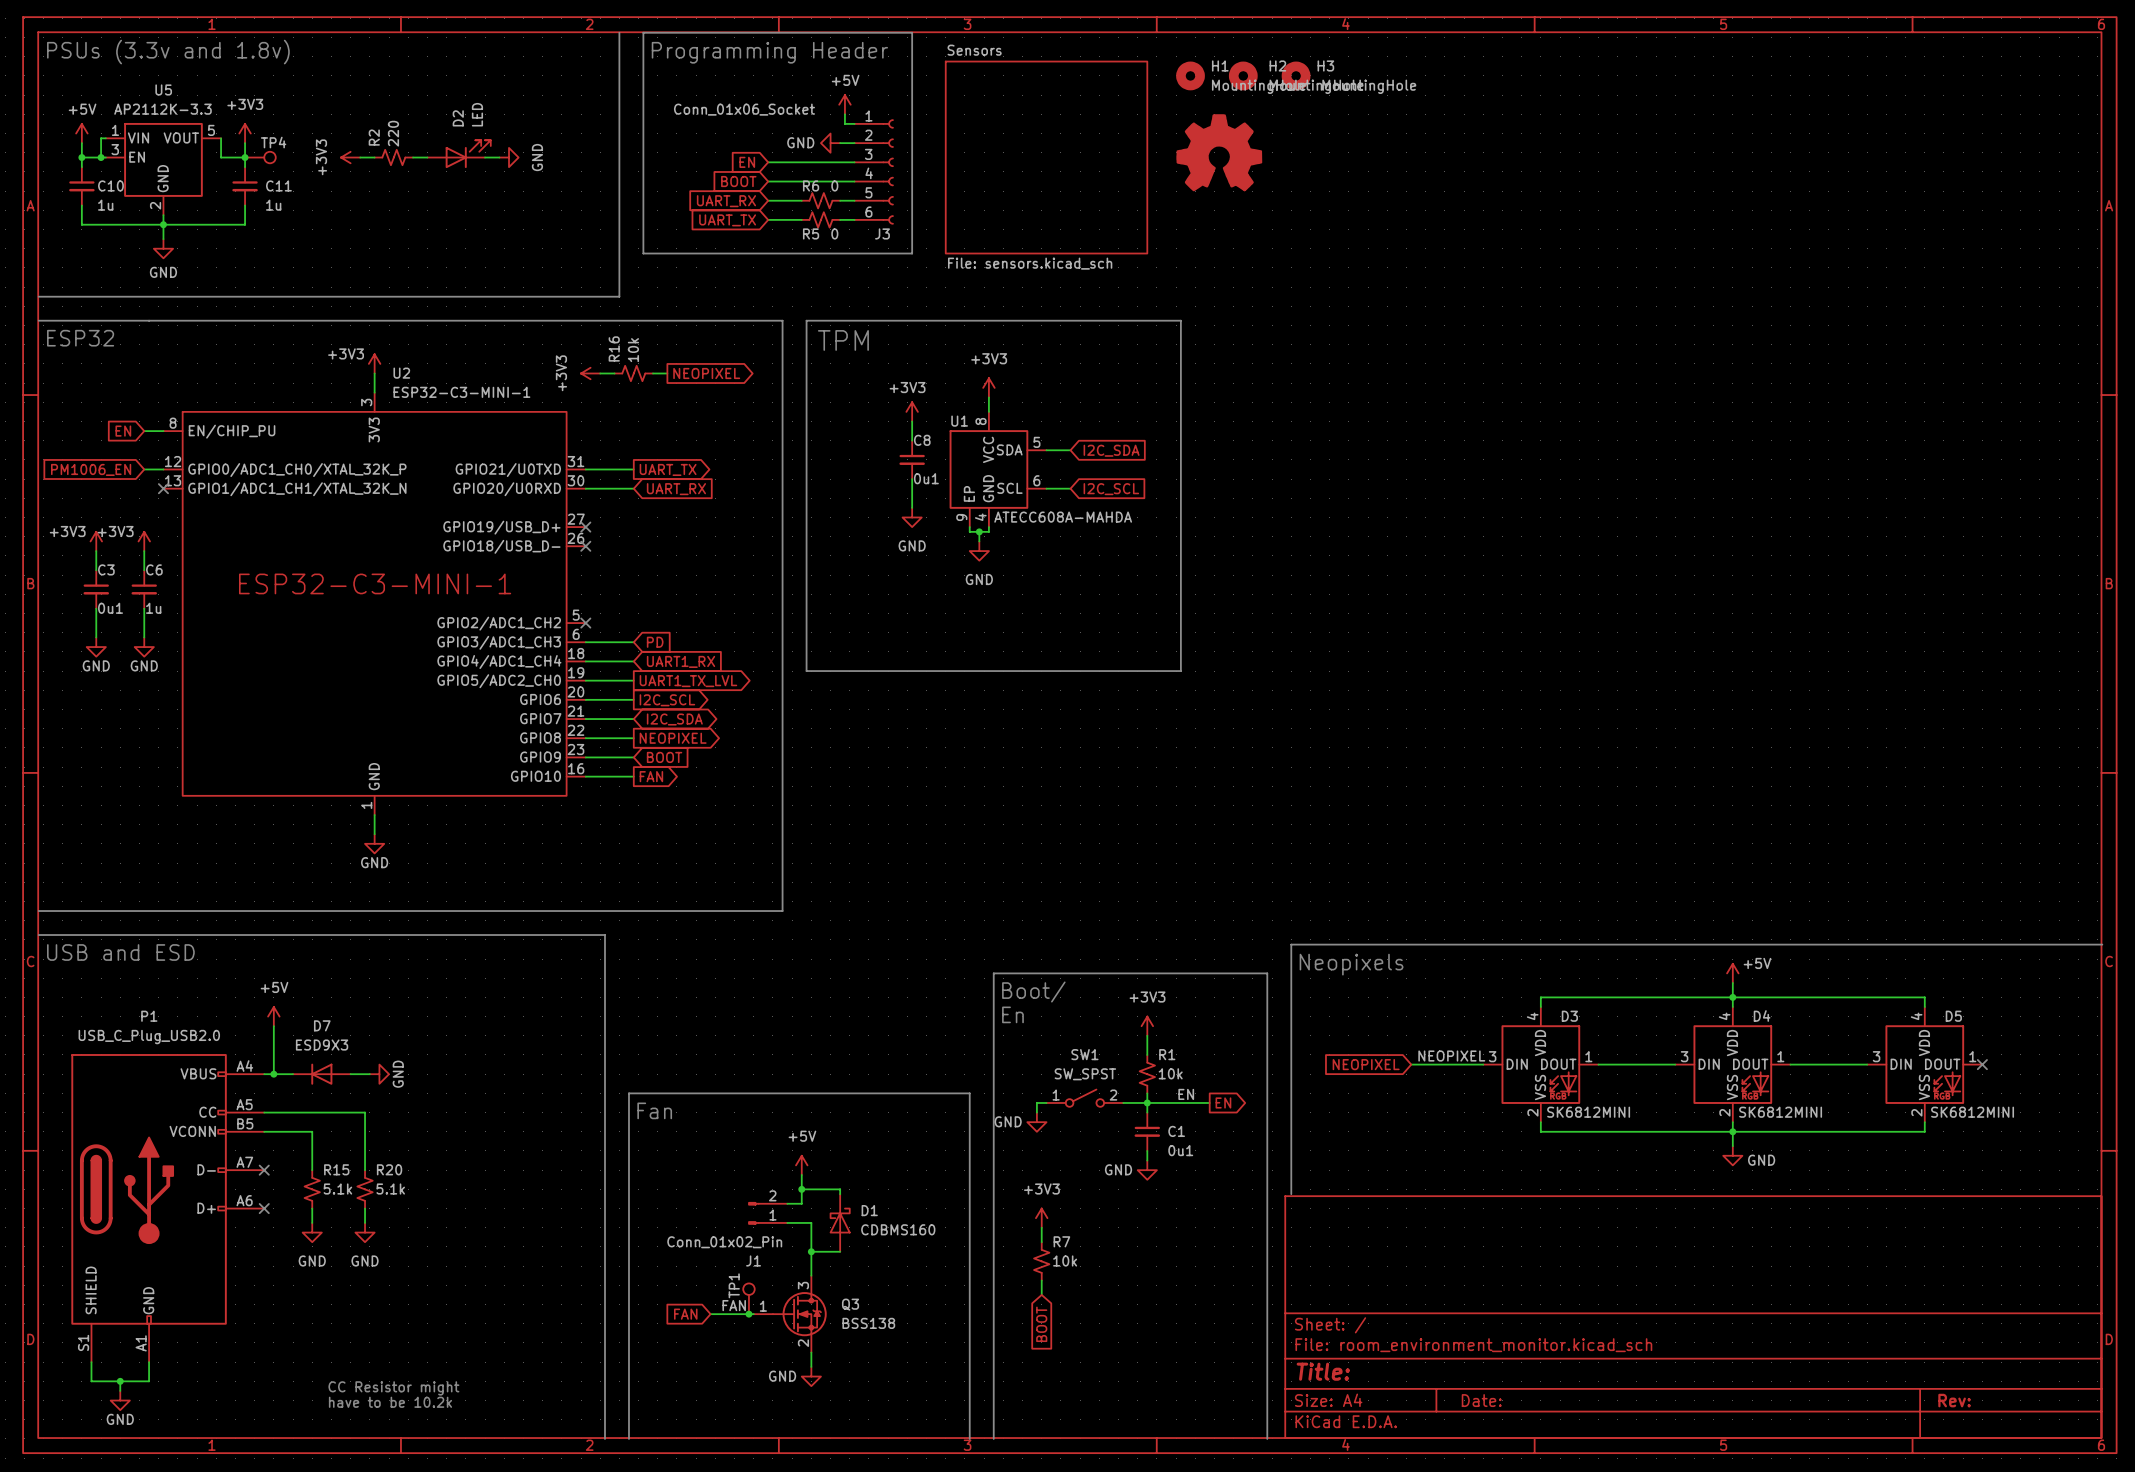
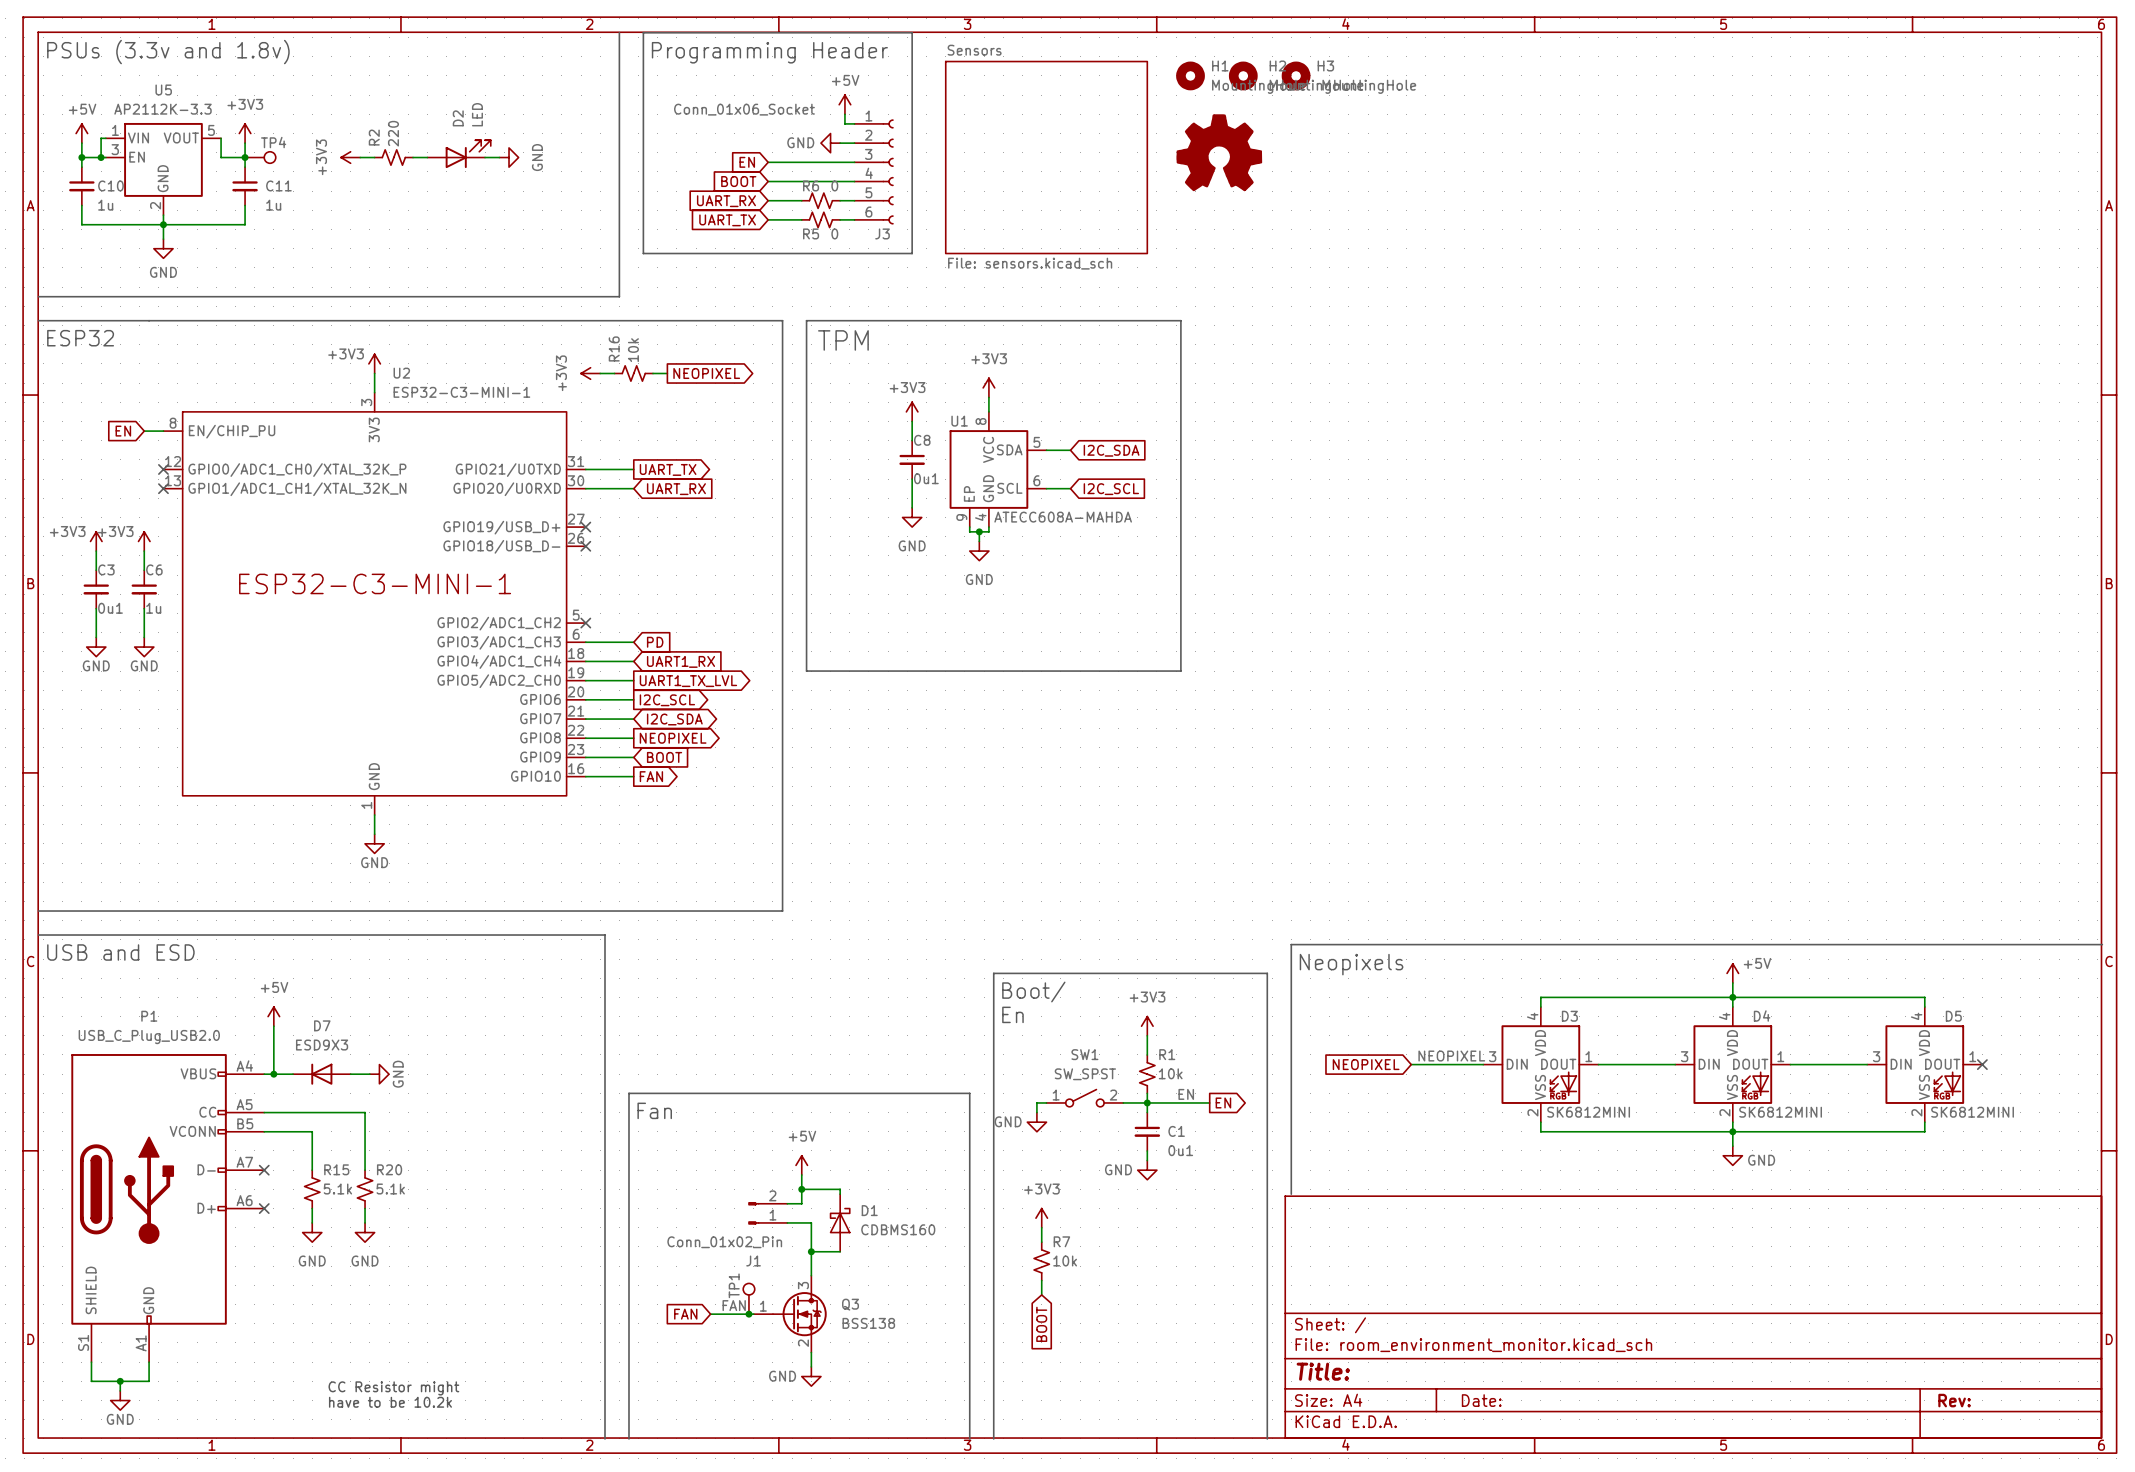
global label: PM1006_EN (91, 469) -> none
wire: (144, 469) (163, 469) -> none
no-connect mark: none -> (163, 469)

